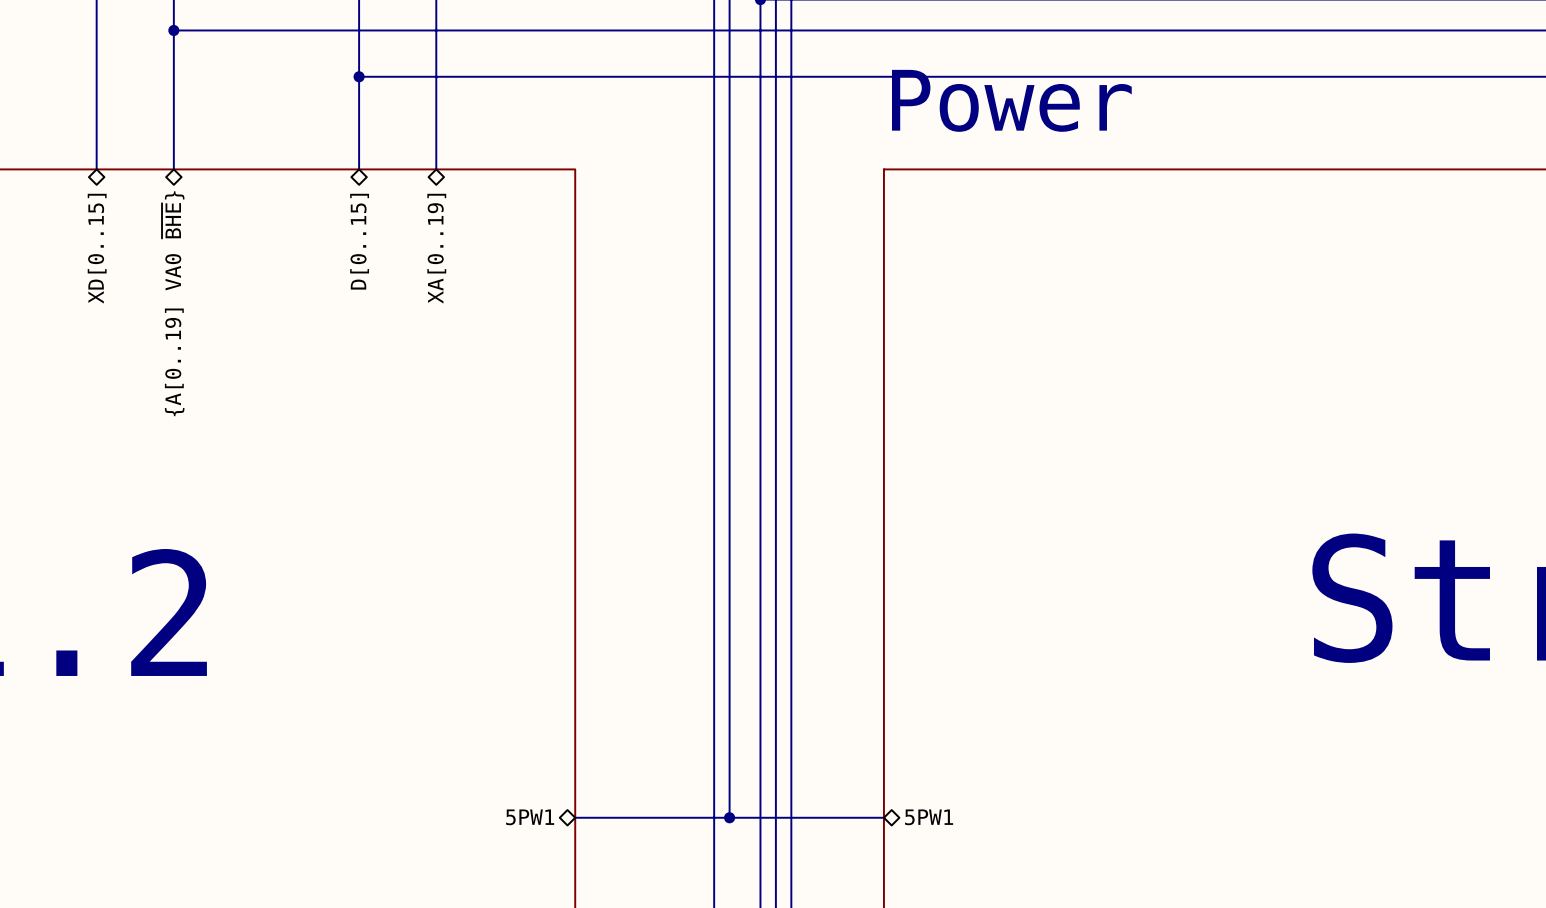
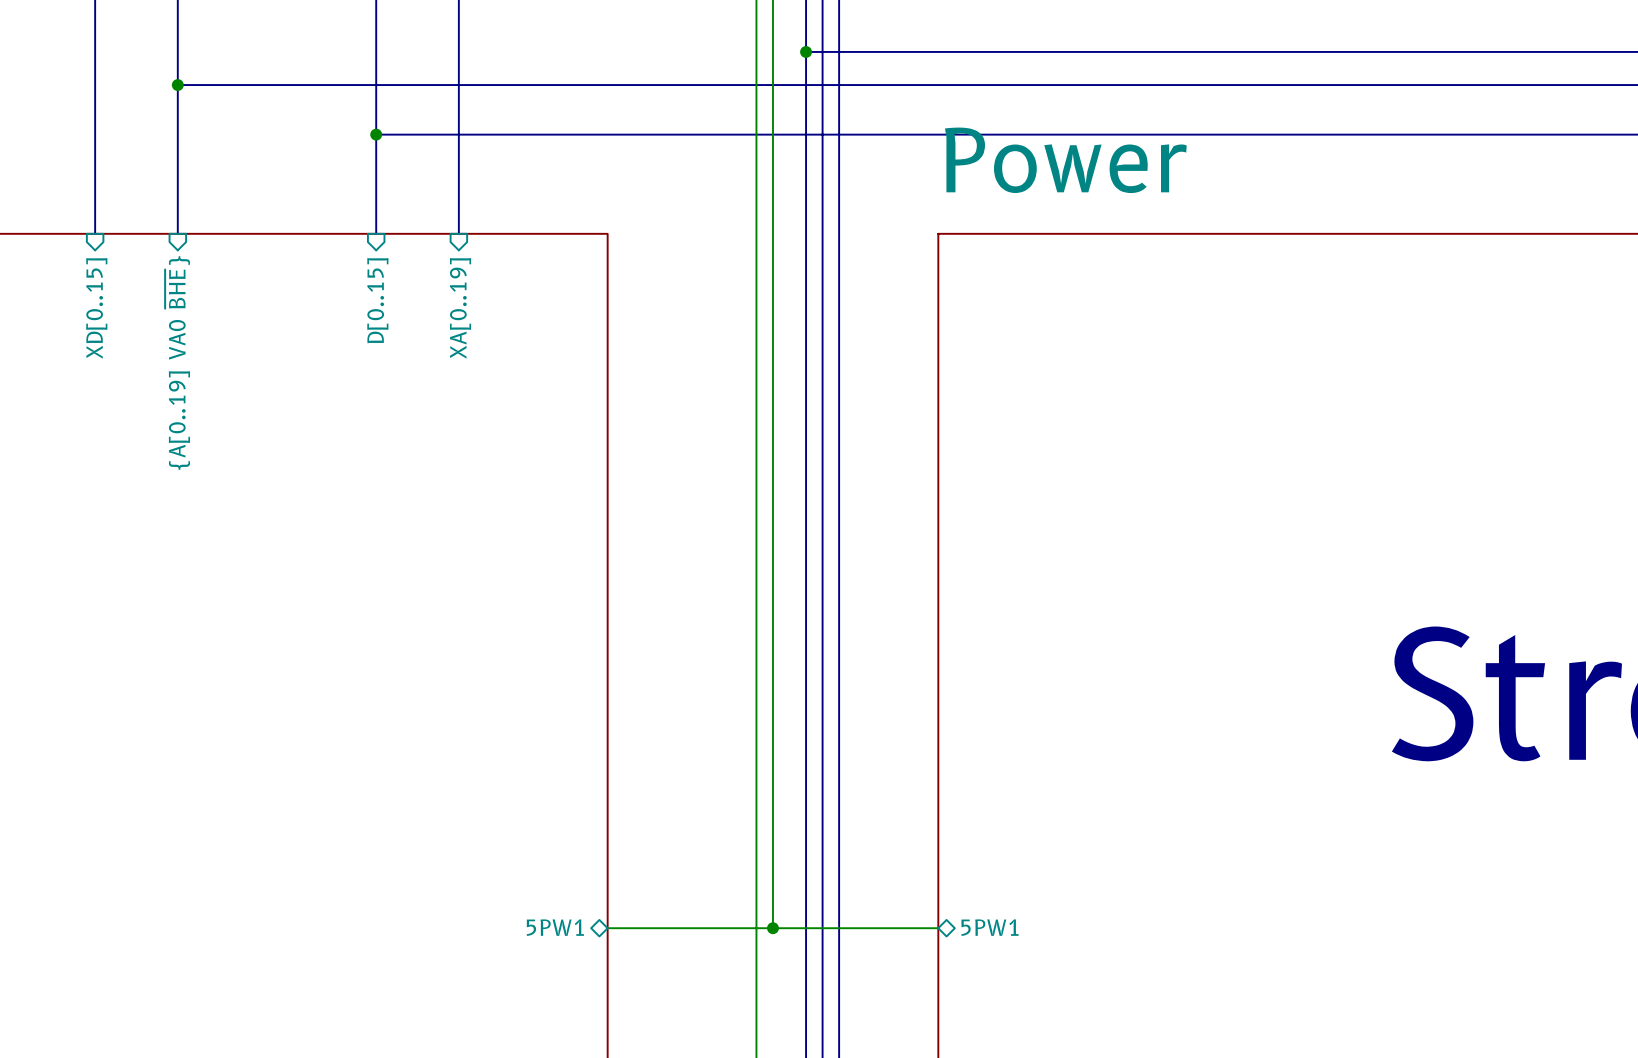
sheet pin shape: bidirectional (359, 241) -> input (377, 300)
sheet pin shape: bidirectional (97, 248) -> input (96, 308)
sheet pin shape: bidirectional (436, 248) -> input (460, 308)
sheet pin shape: bidirectional (173, 303) -> input (177, 363)

